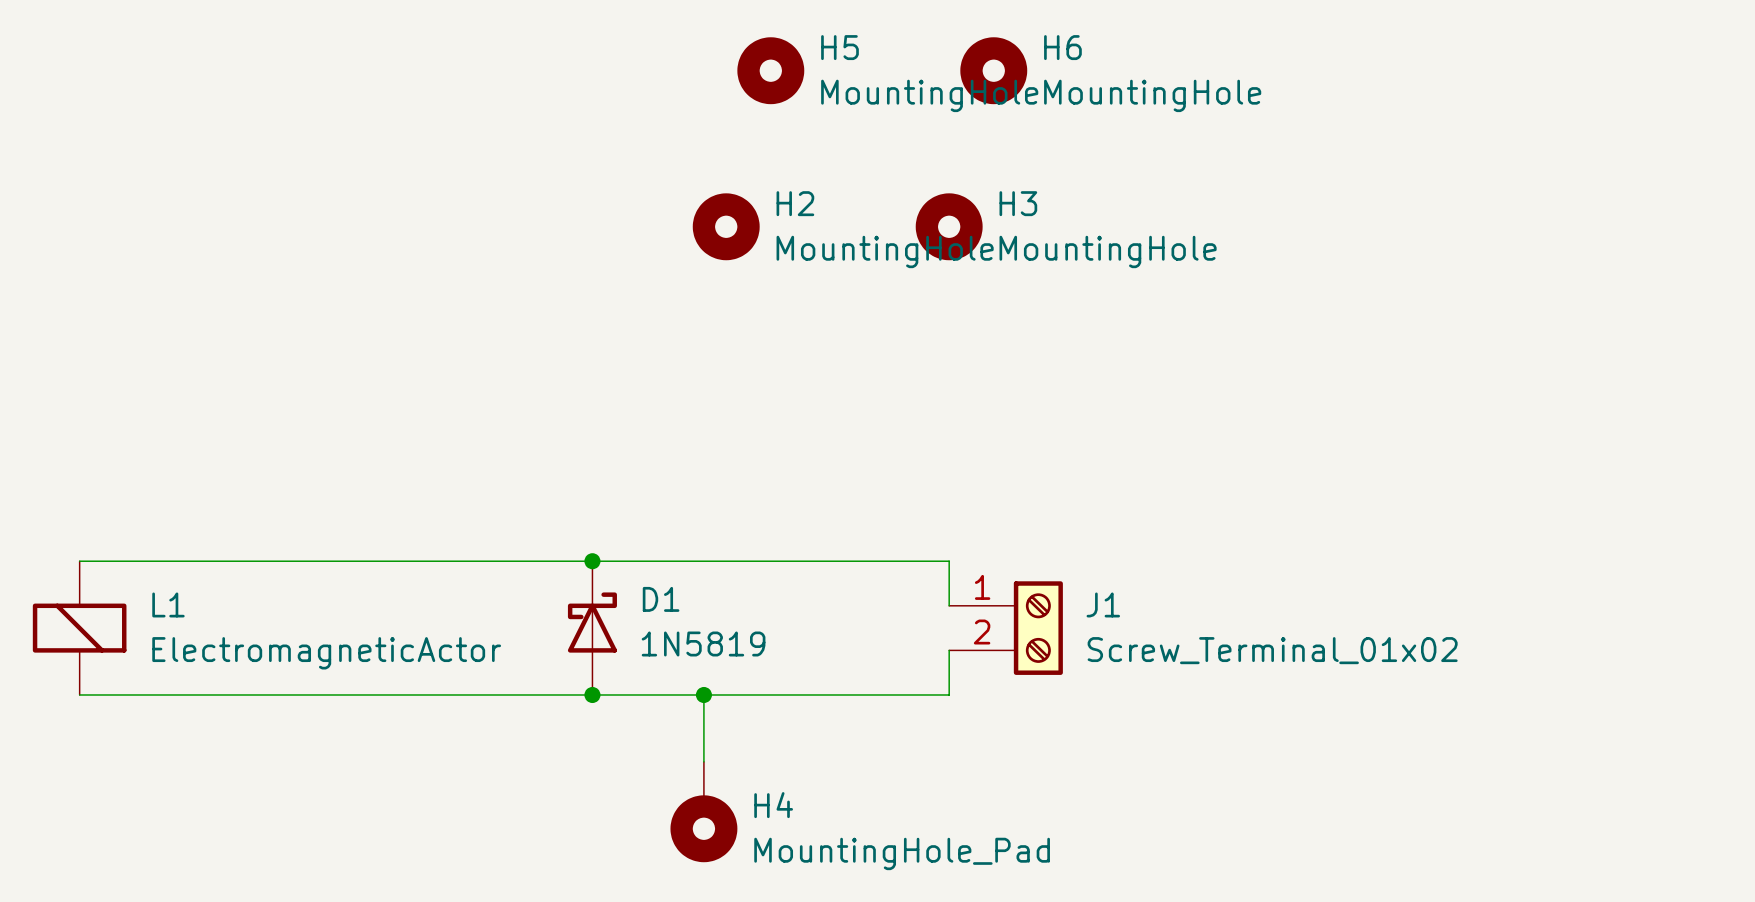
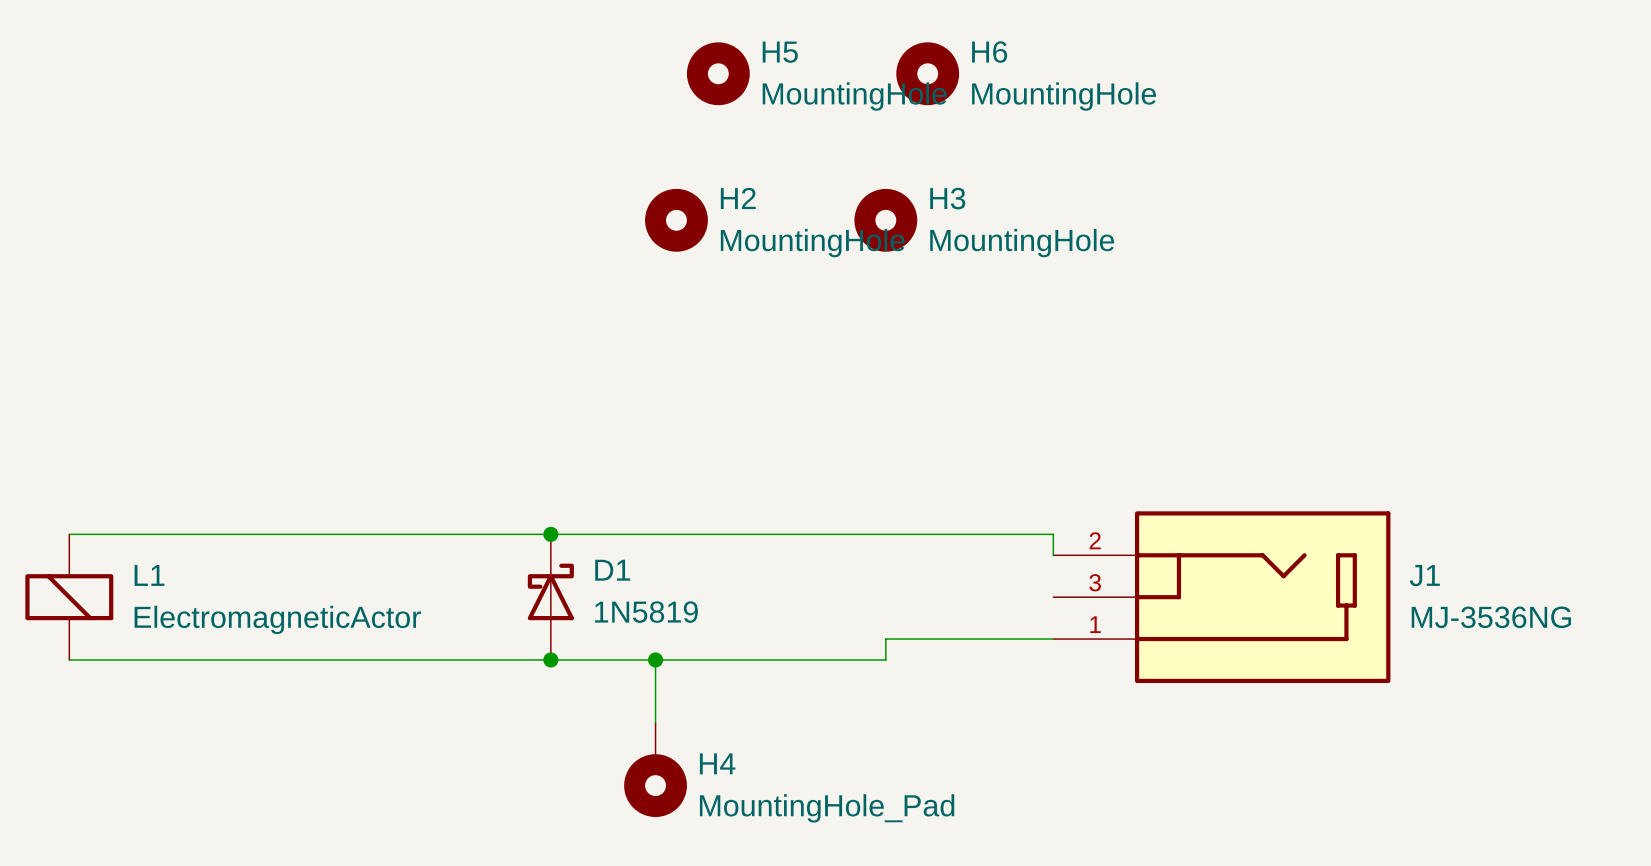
wire: (949, 561) (949, 605) -> (885, 534) (1053, 534) (1053, 555)
J1 symbol: [949, 581, 1063, 675] -> [1053, 511, 1391, 684]
J1 name position: J1 (1103, 604) -> J1 (1424, 575)
wire: (949, 650) (949, 672) -> (1053, 639) (885, 639)
J1 value: Screw_Terminal_01x02 (1272, 650) -> MJ-3536NG (1491, 617)

